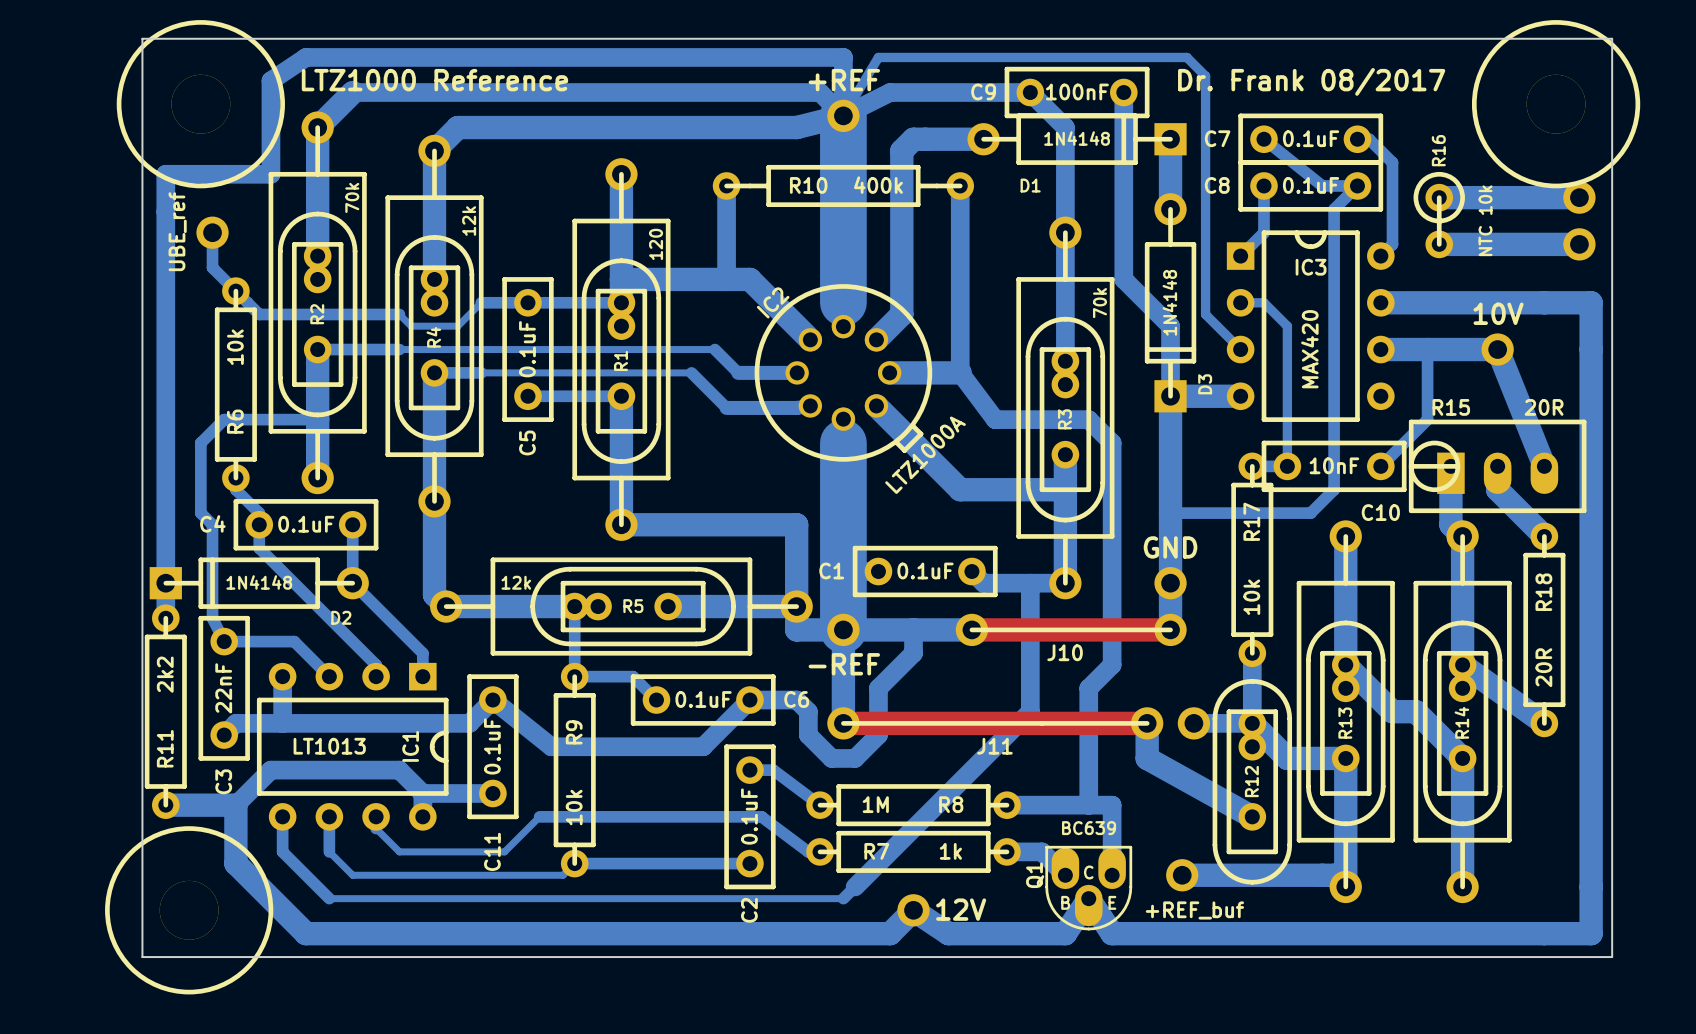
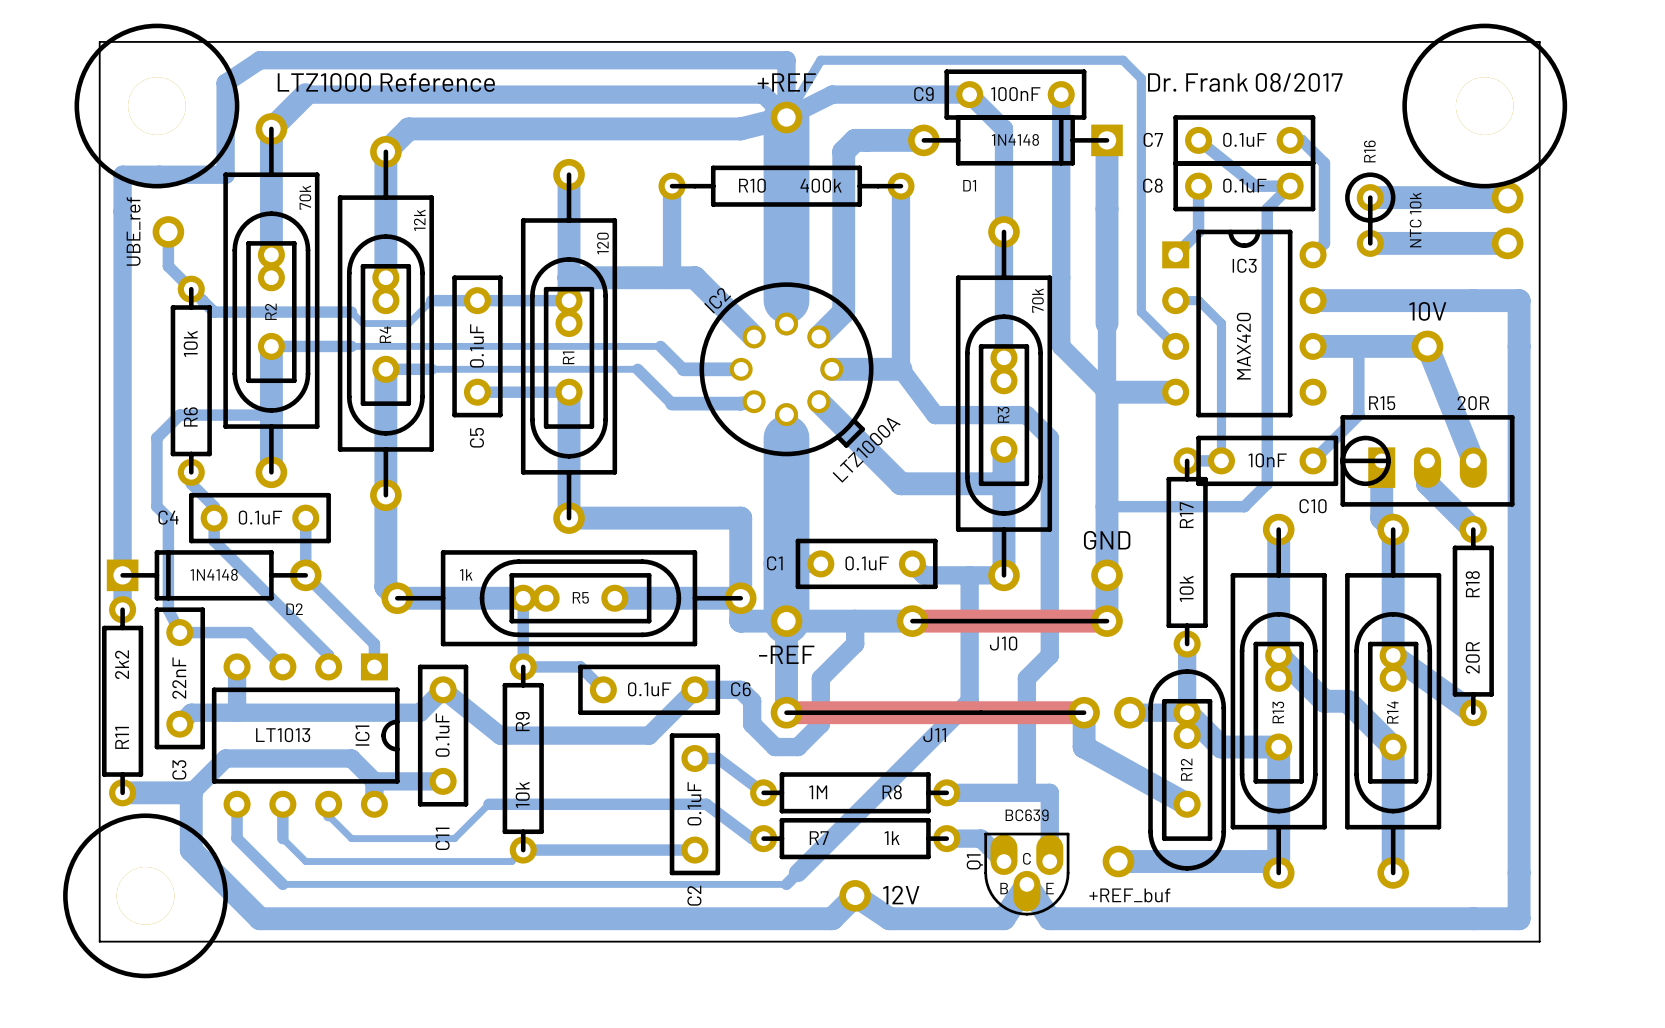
bottom track: none -> (1107, 209) (1107, 323)
bottom track: (1123, 279) (1170, 326) -> (1061, 277) (1061, 346) (1107, 392)
D3: 1N4148 (1170, 302) -> none
R5 value: 12k (516, 582) -> 1k (466, 574)

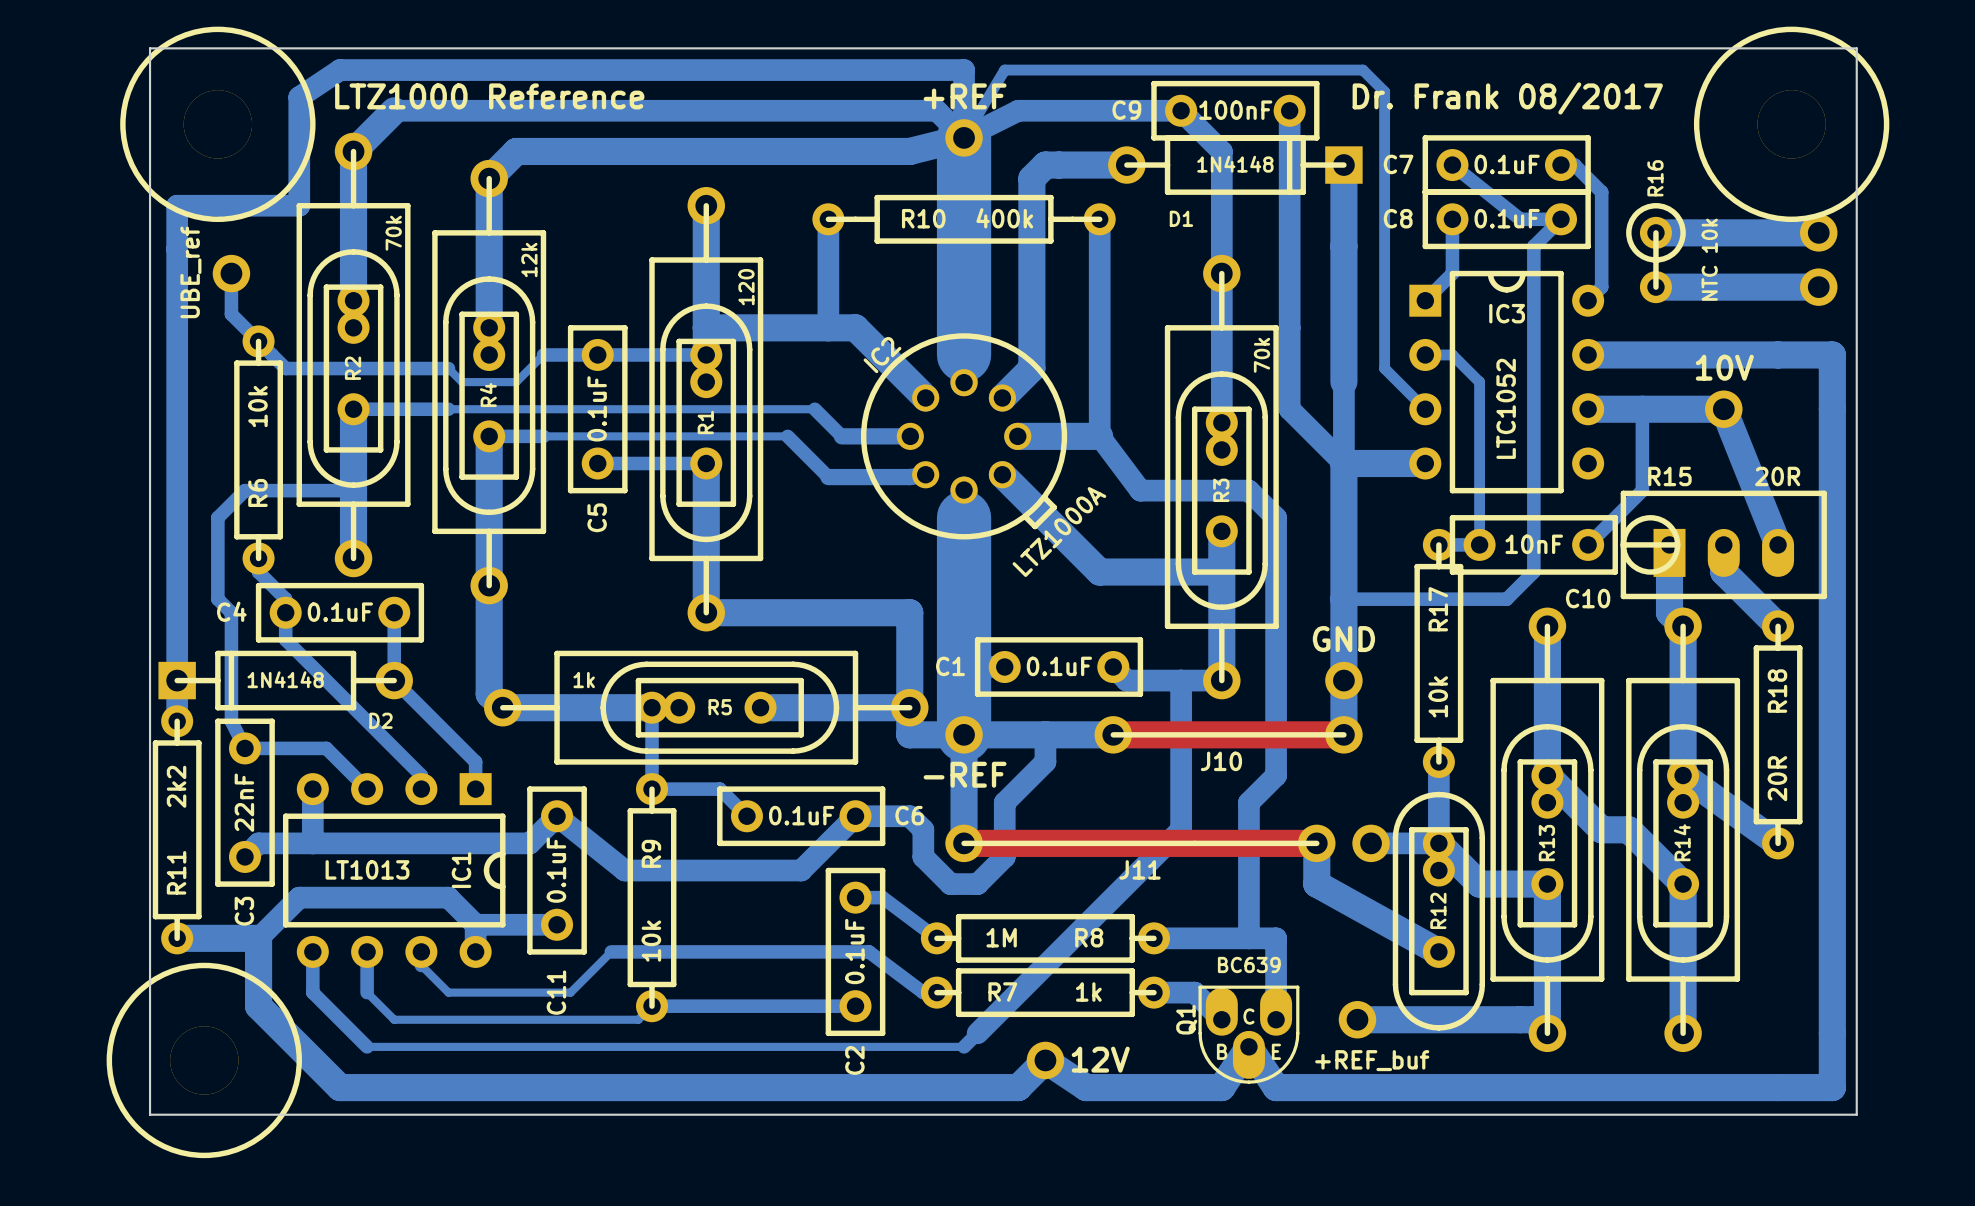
IC3 value: MAX420 (1243, 346) -> LTC1052 (1506, 408)

